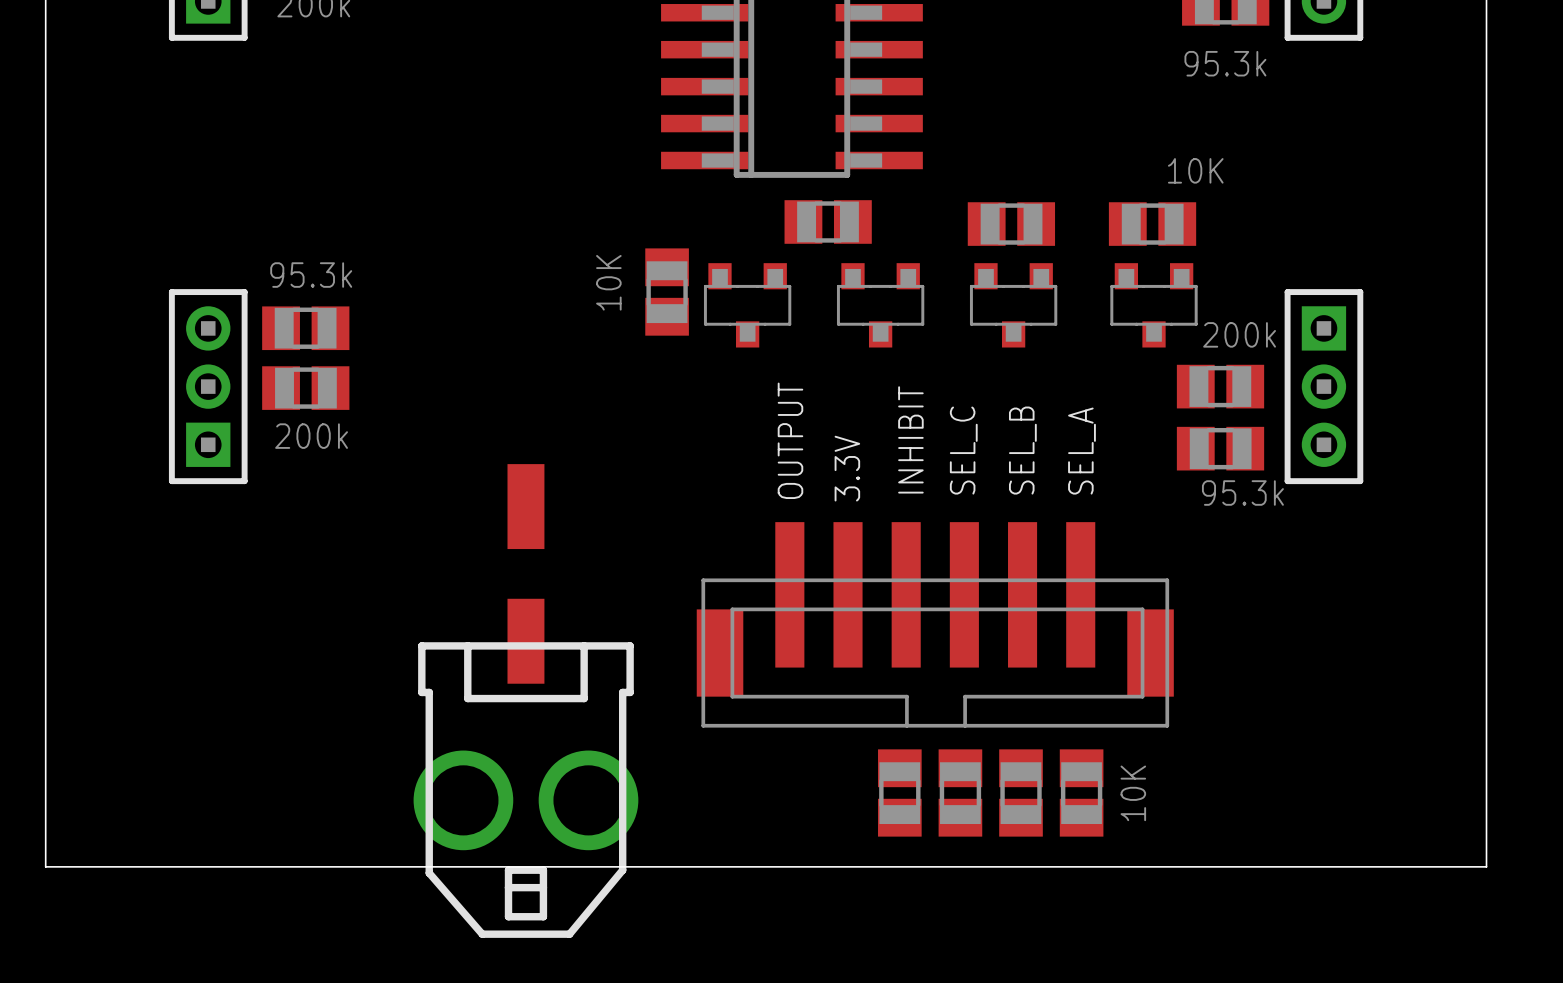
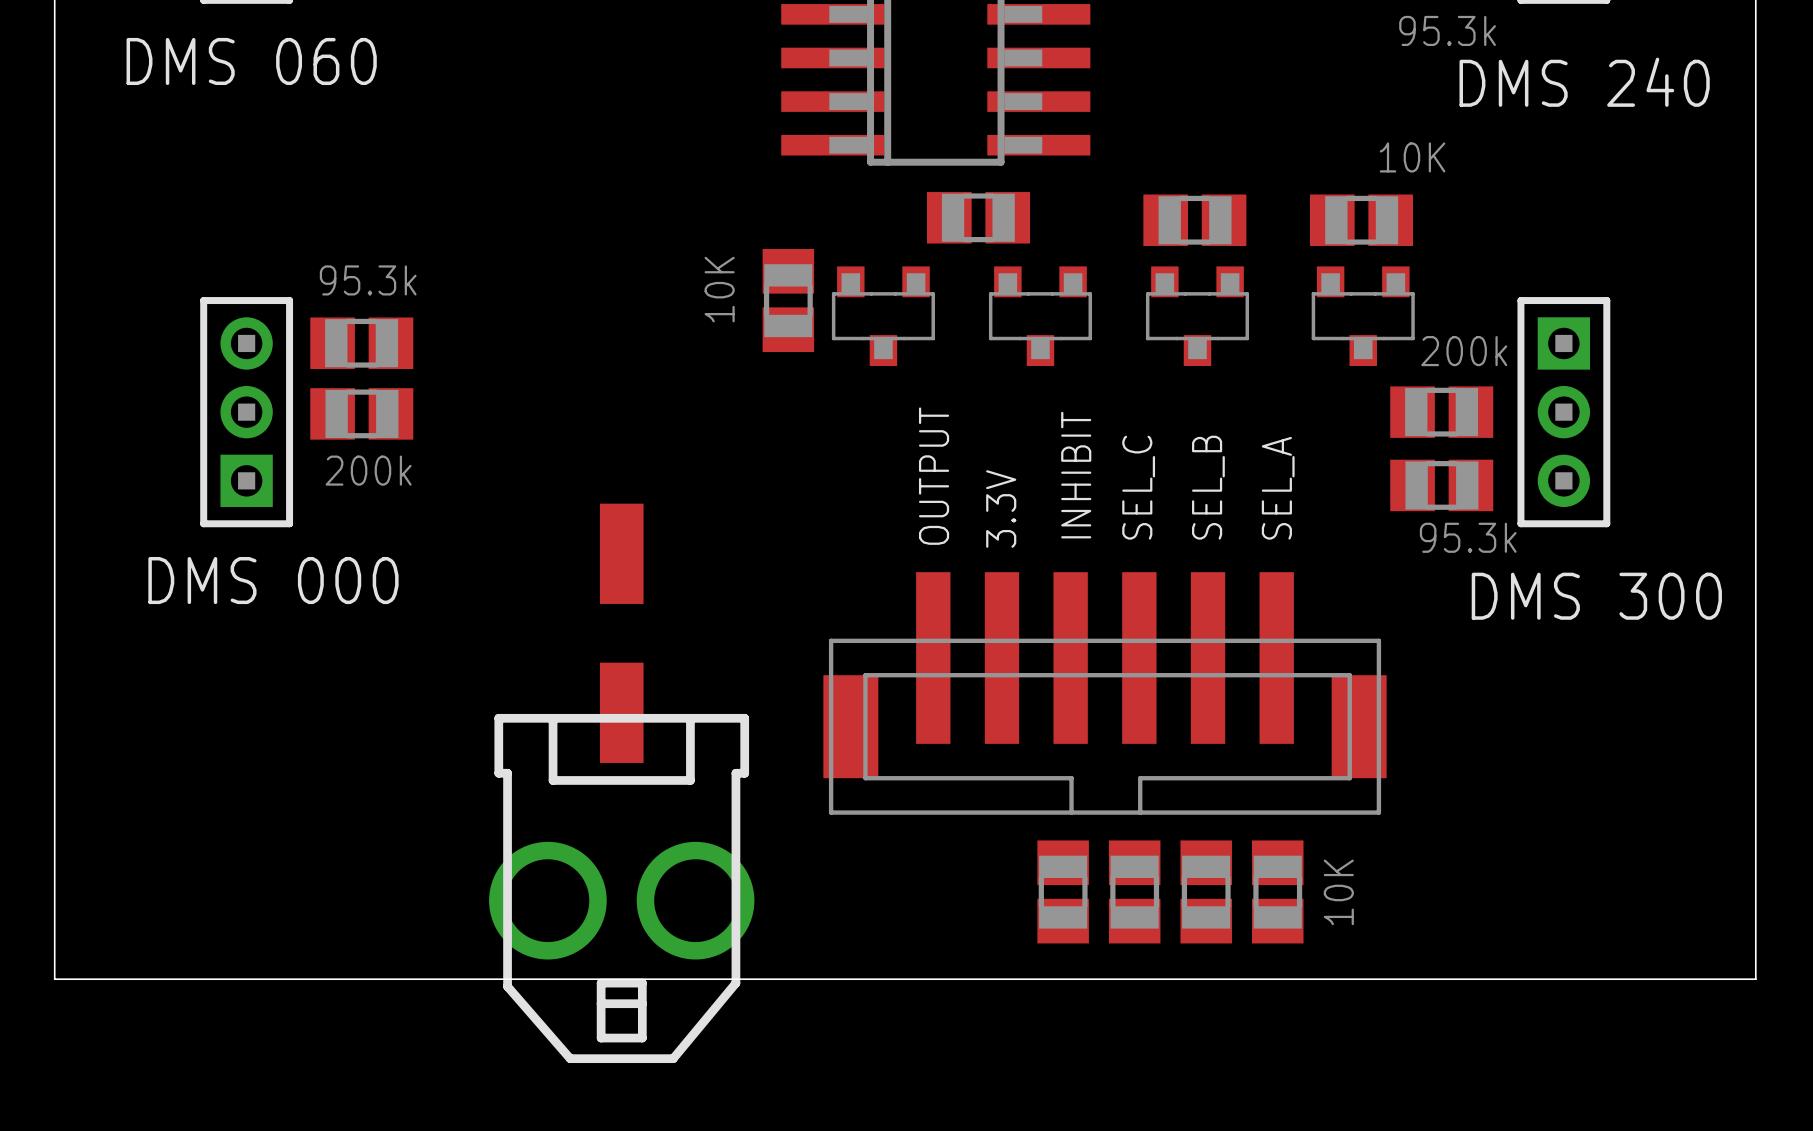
text: none -> DMS 060 (251, 61)
text: none -> DMS 240 (1584, 82)
text: none -> DMS 000 (273, 580)
text: none -> DMS 300 (1596, 596)

